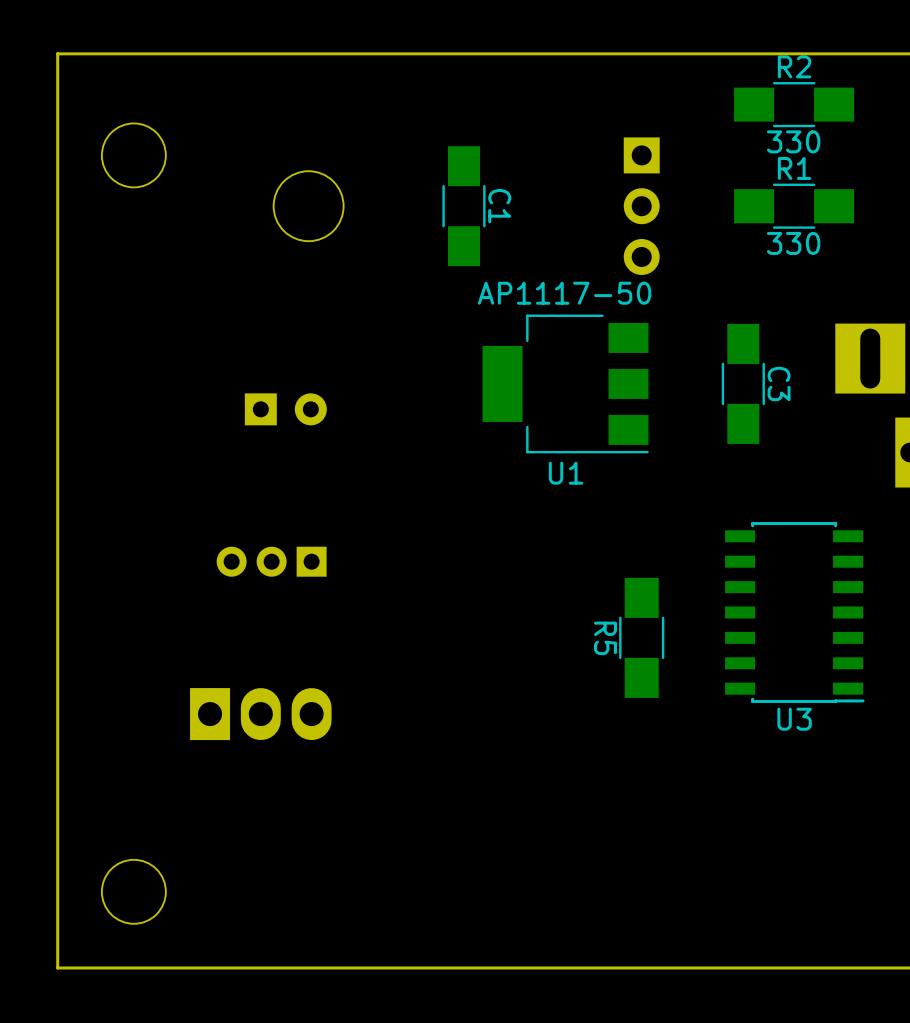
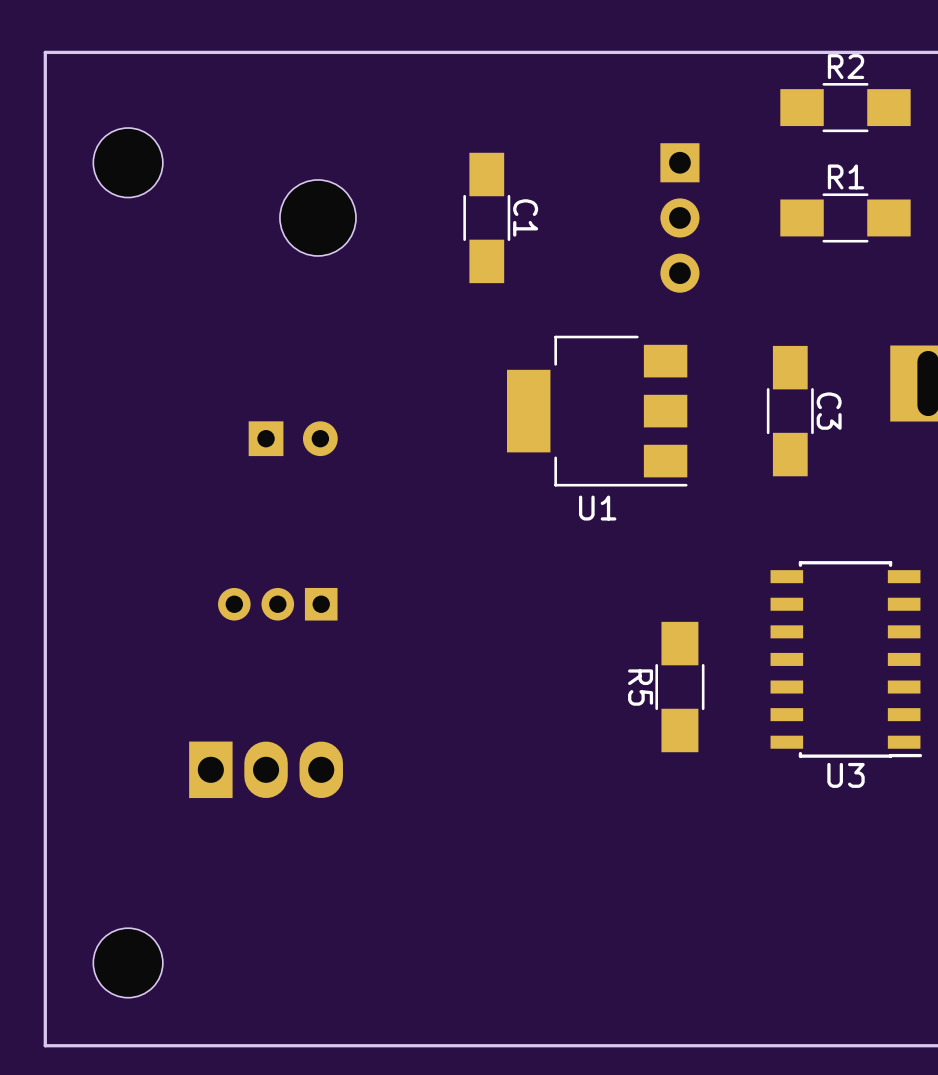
R2 value: 330 (793, 141) -> none
R1 value: 330 (793, 243) -> none
U1 value: AP1117-50 (564, 293) -> none

